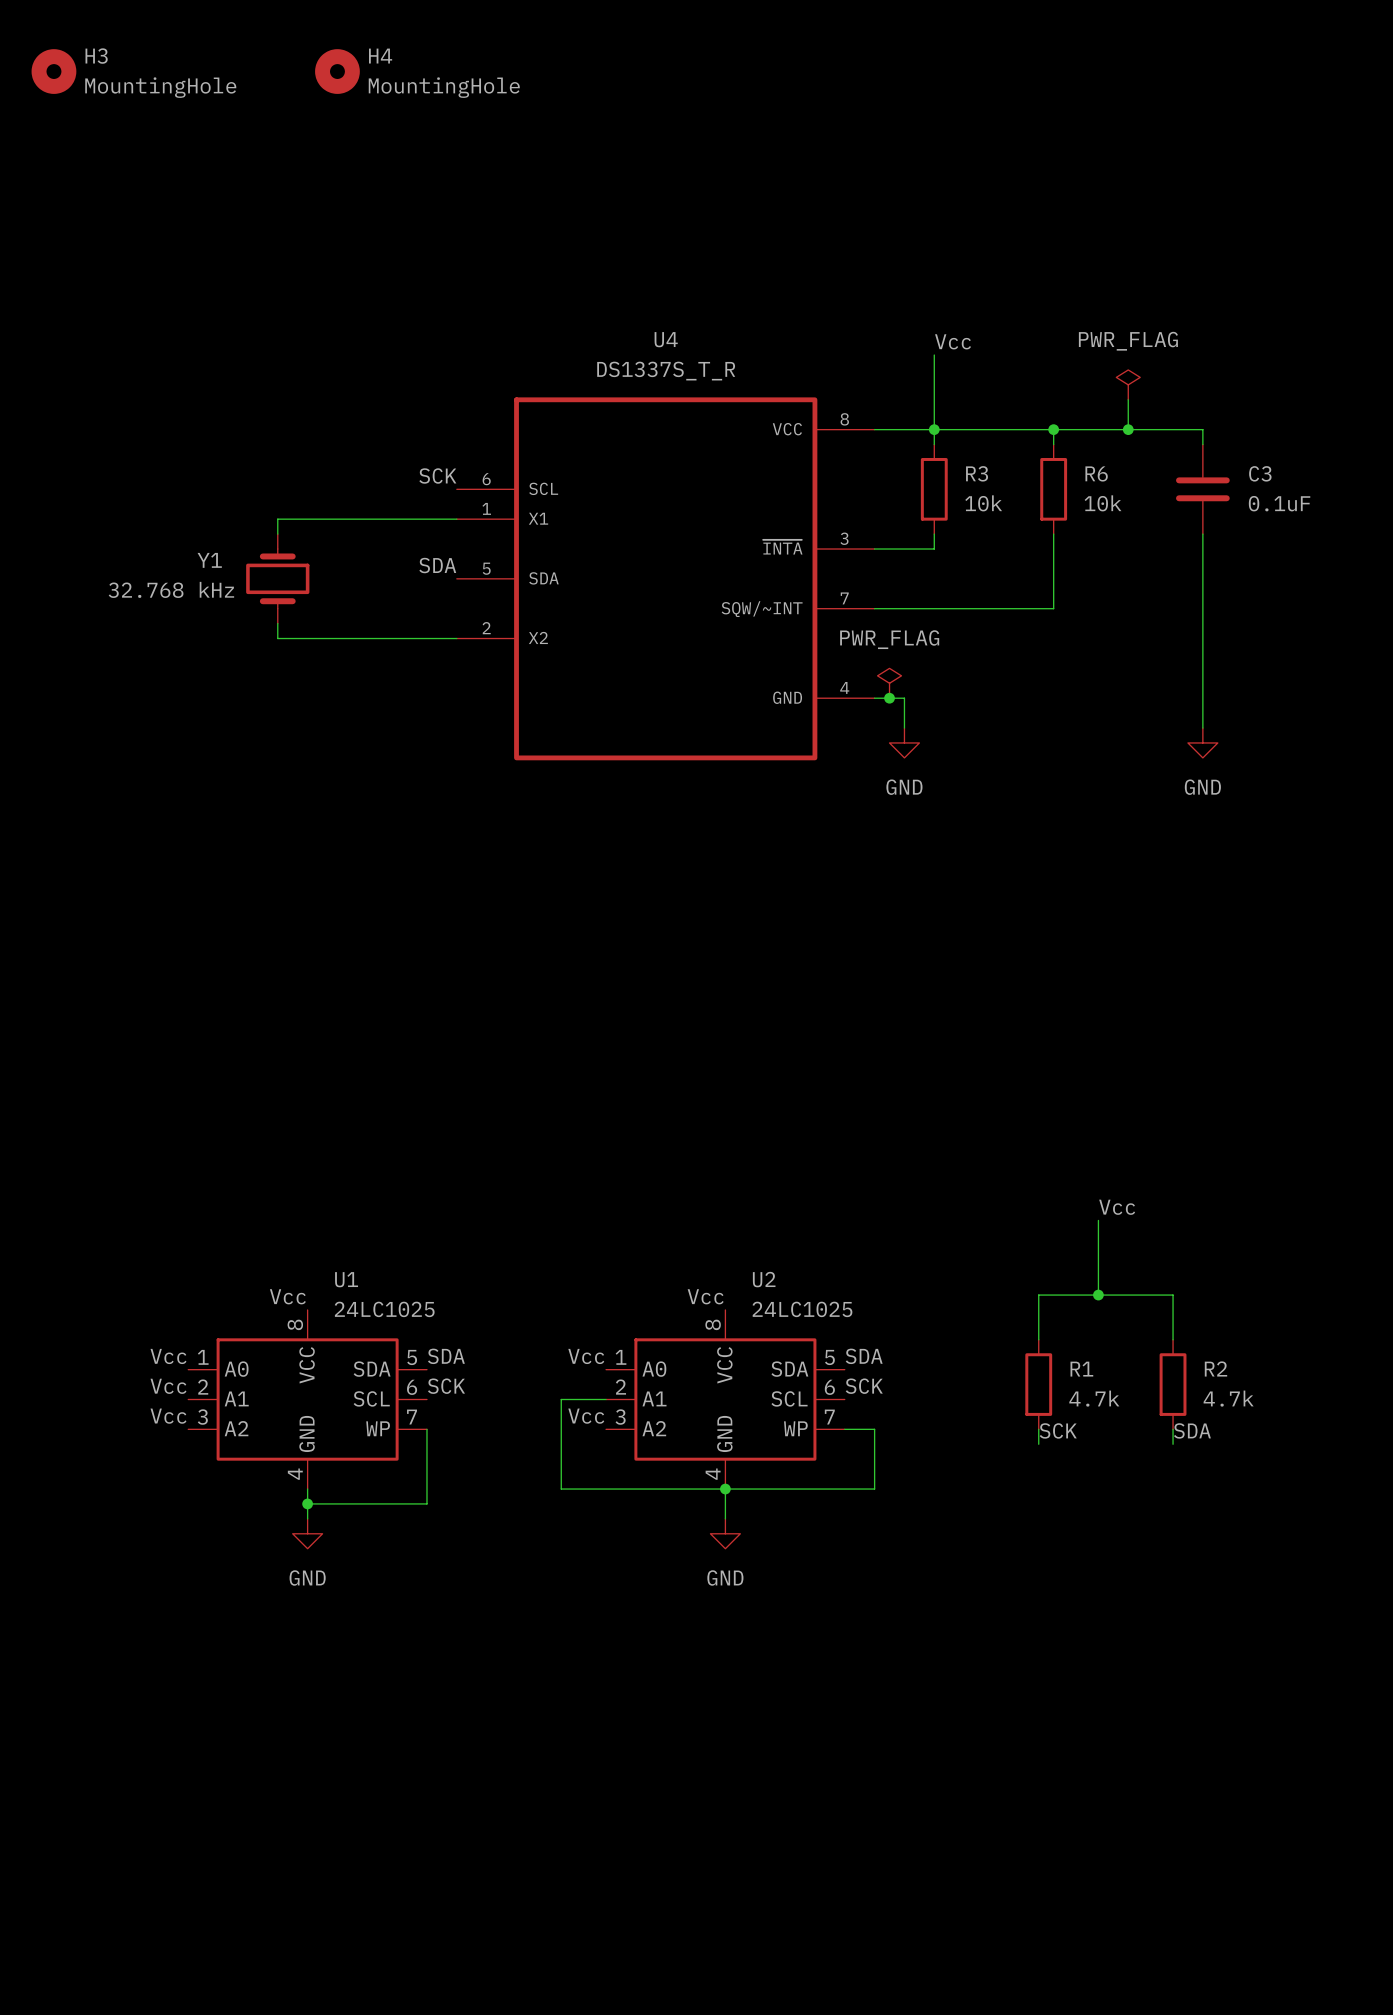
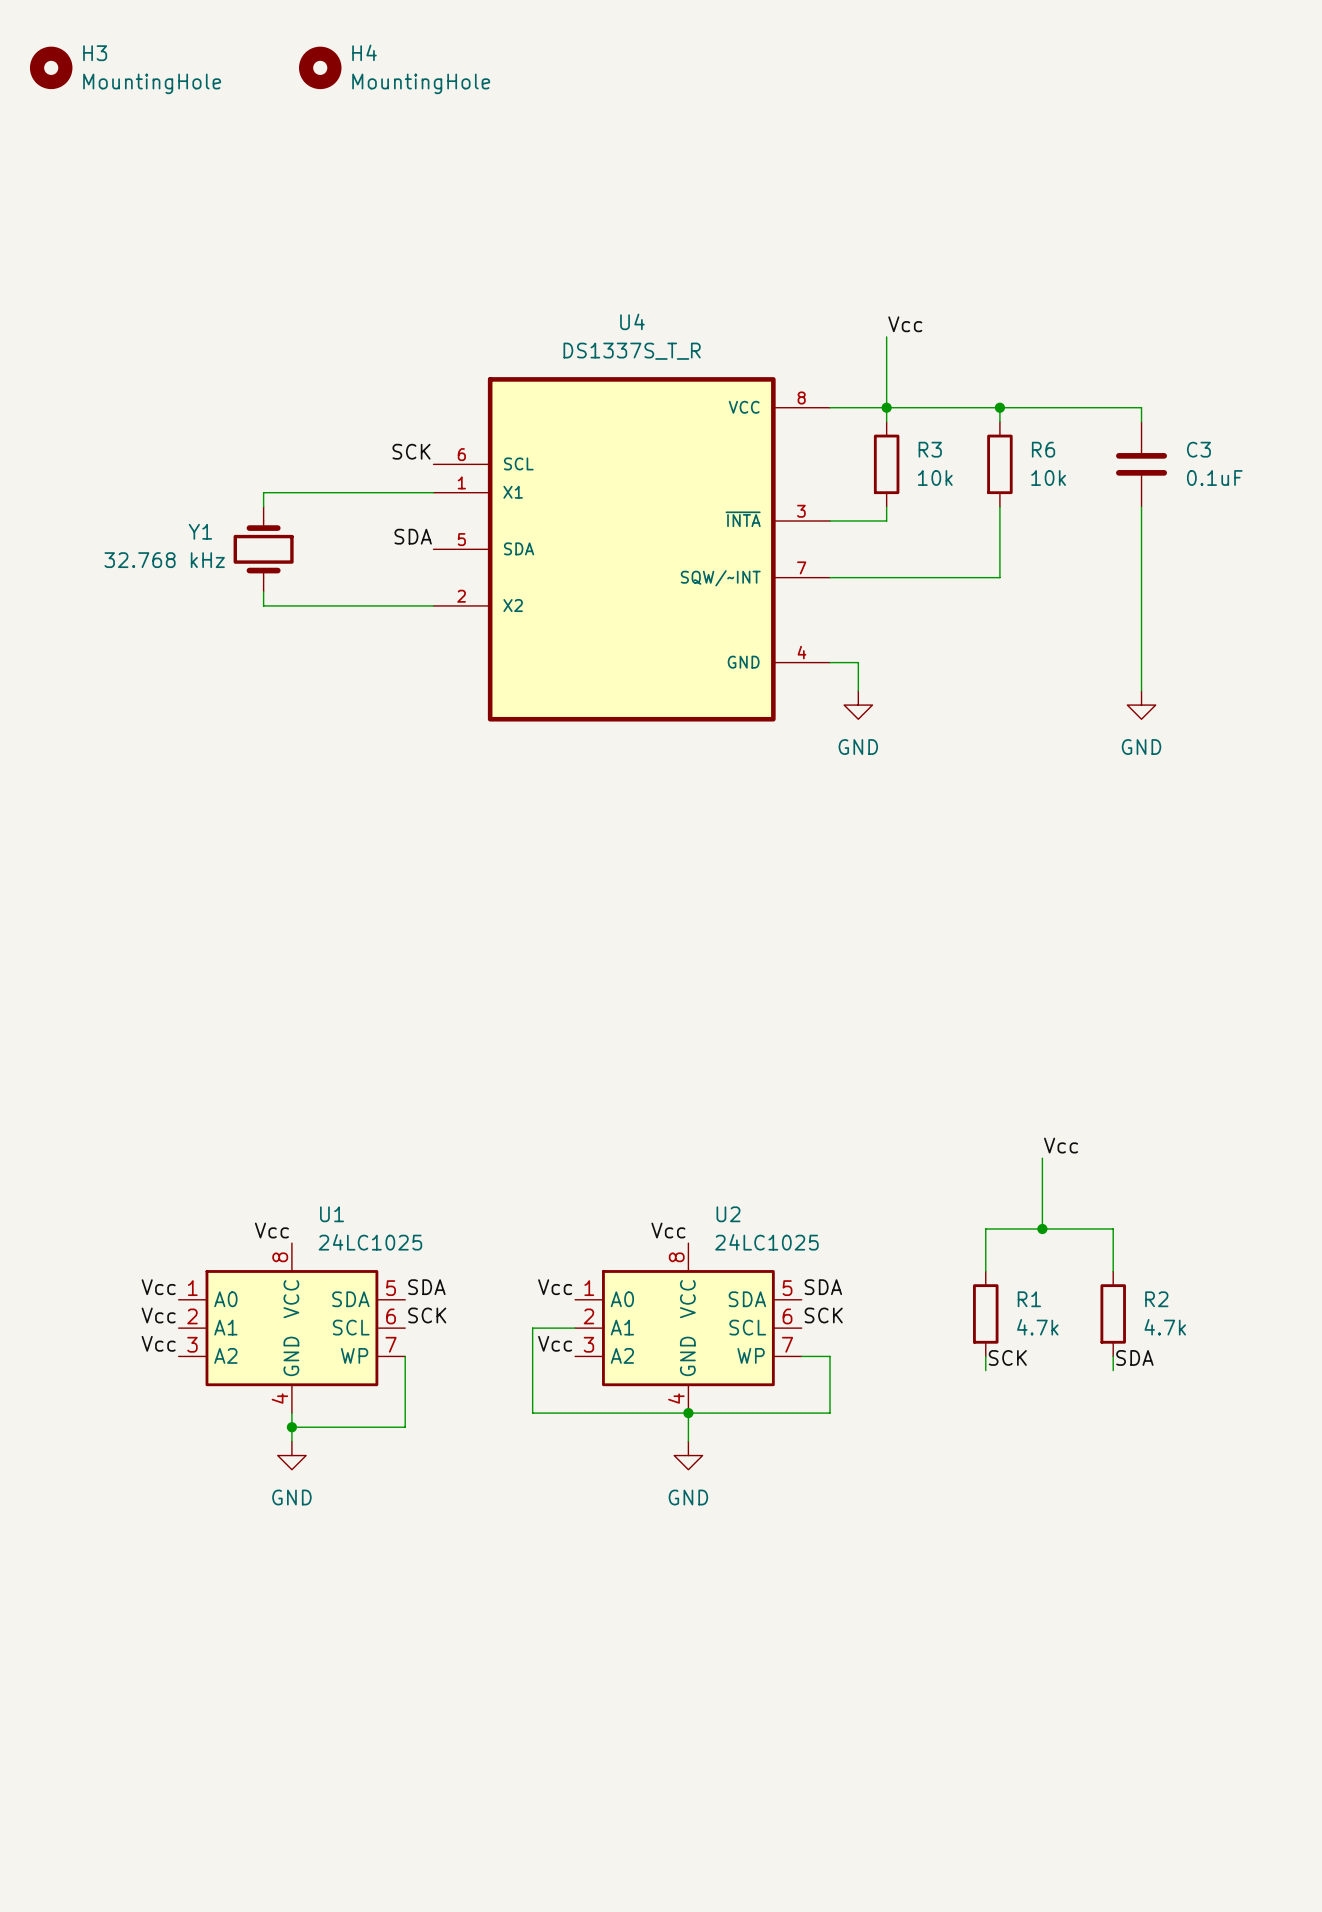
power symbol: PWR_FLAG (1128, 384) -> none
wire: (1128, 399) (1128, 429) -> none
junction: (1128, 429) -> none
power symbol: PWR_FLAG (889, 683) -> none
junction: (889, 698) -> none

